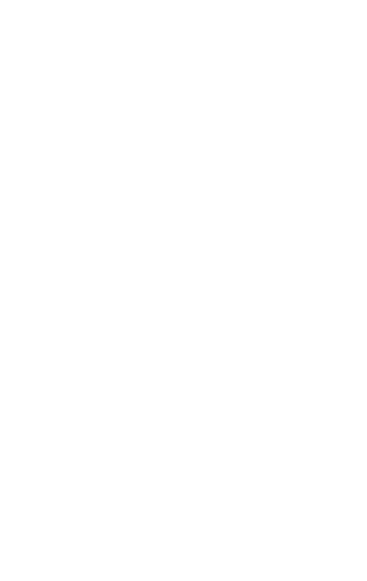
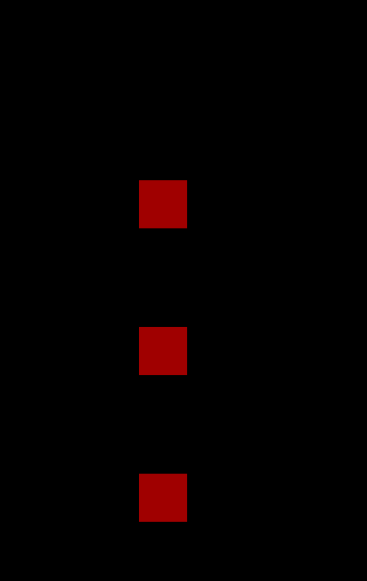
part: none -> (163, 204)
part: none -> (163, 351)
part: none -> (163, 497)

